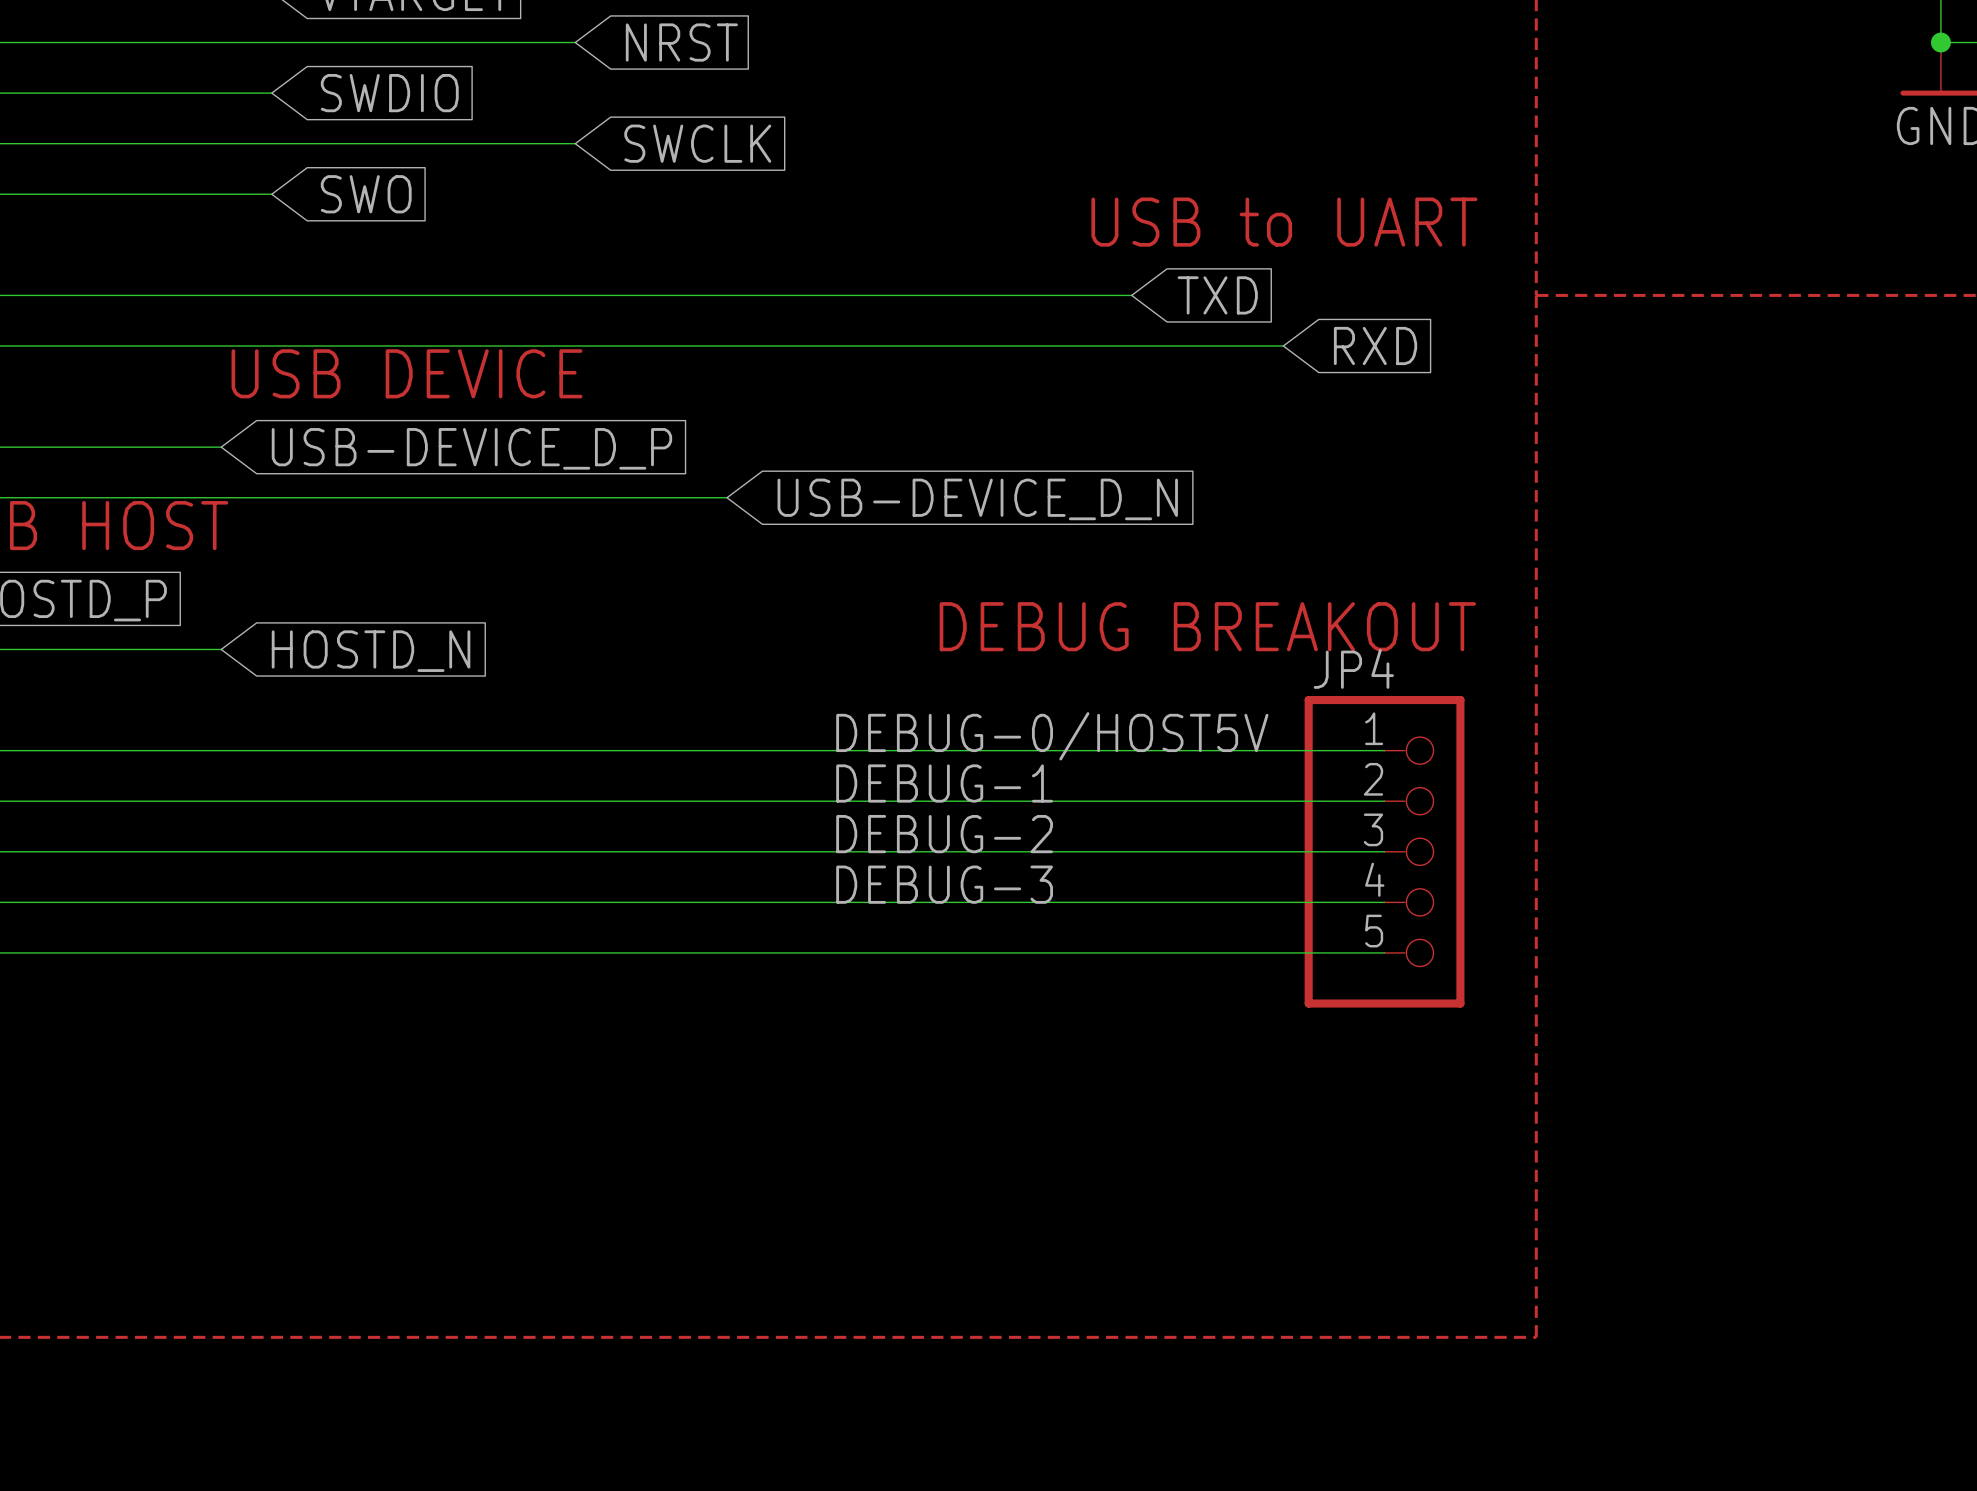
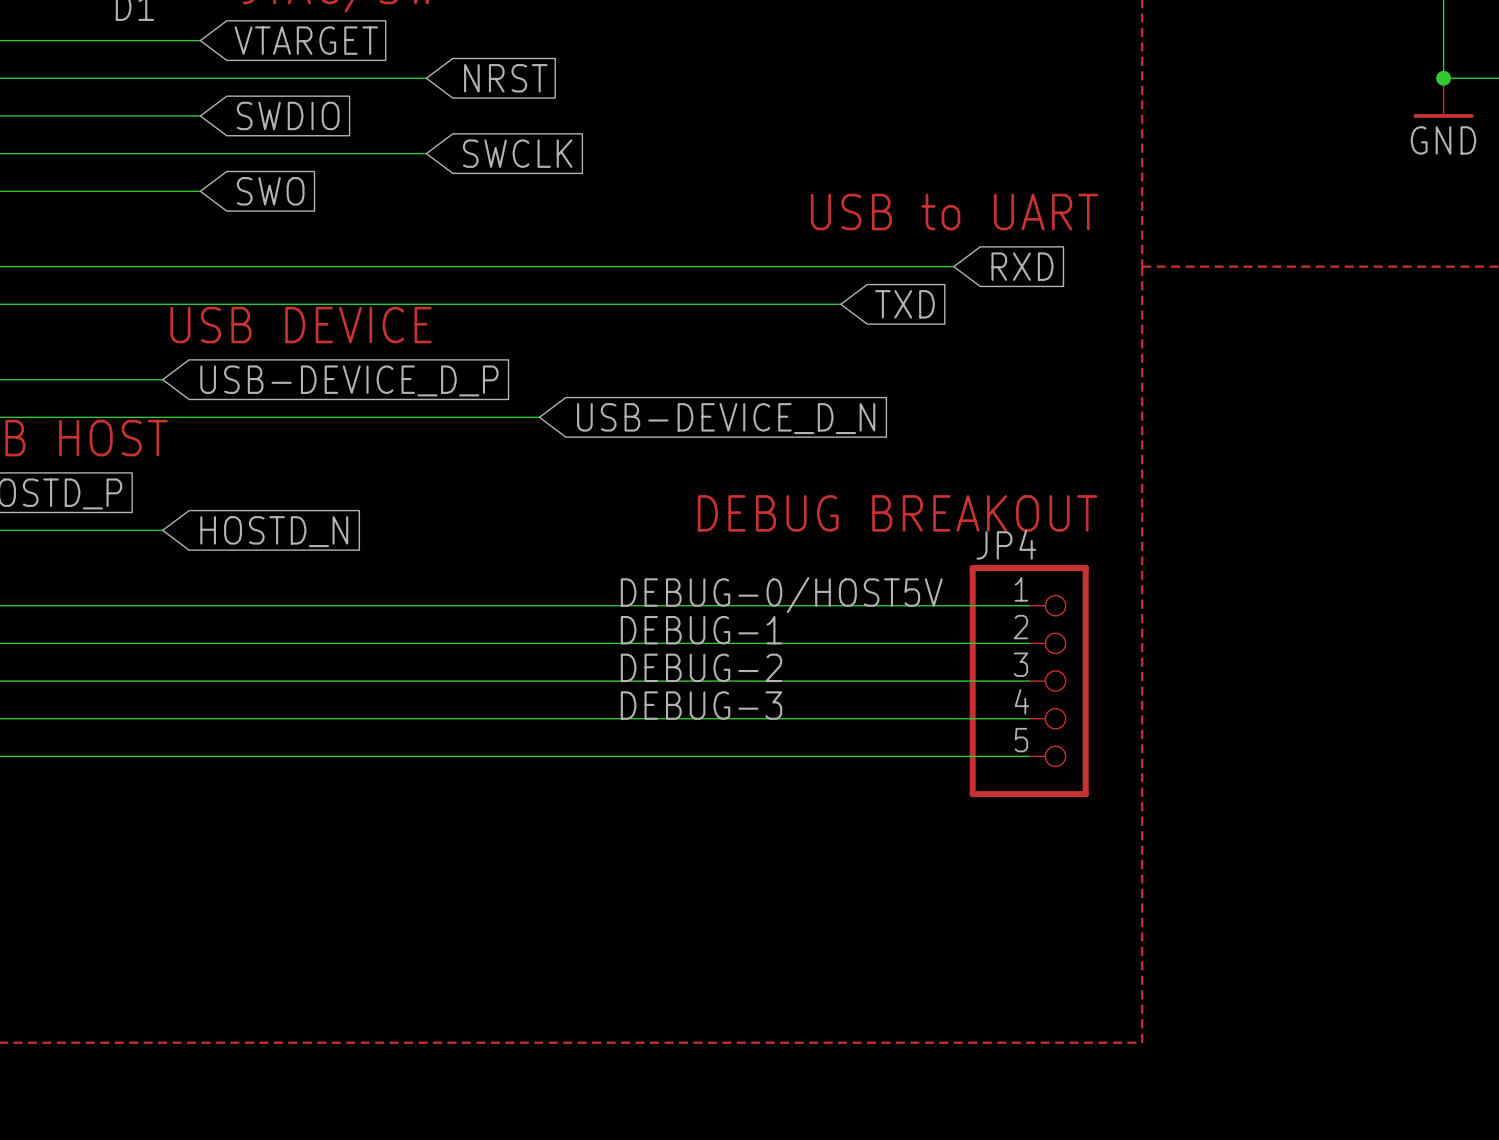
global label position: TXD (1217, 295) -> TXD (904, 304)
wire: (1131, 345) (1283, 345) -> (840, 266) (953, 266)
global label position: RXD (1375, 345) -> RXD (1022, 266)

